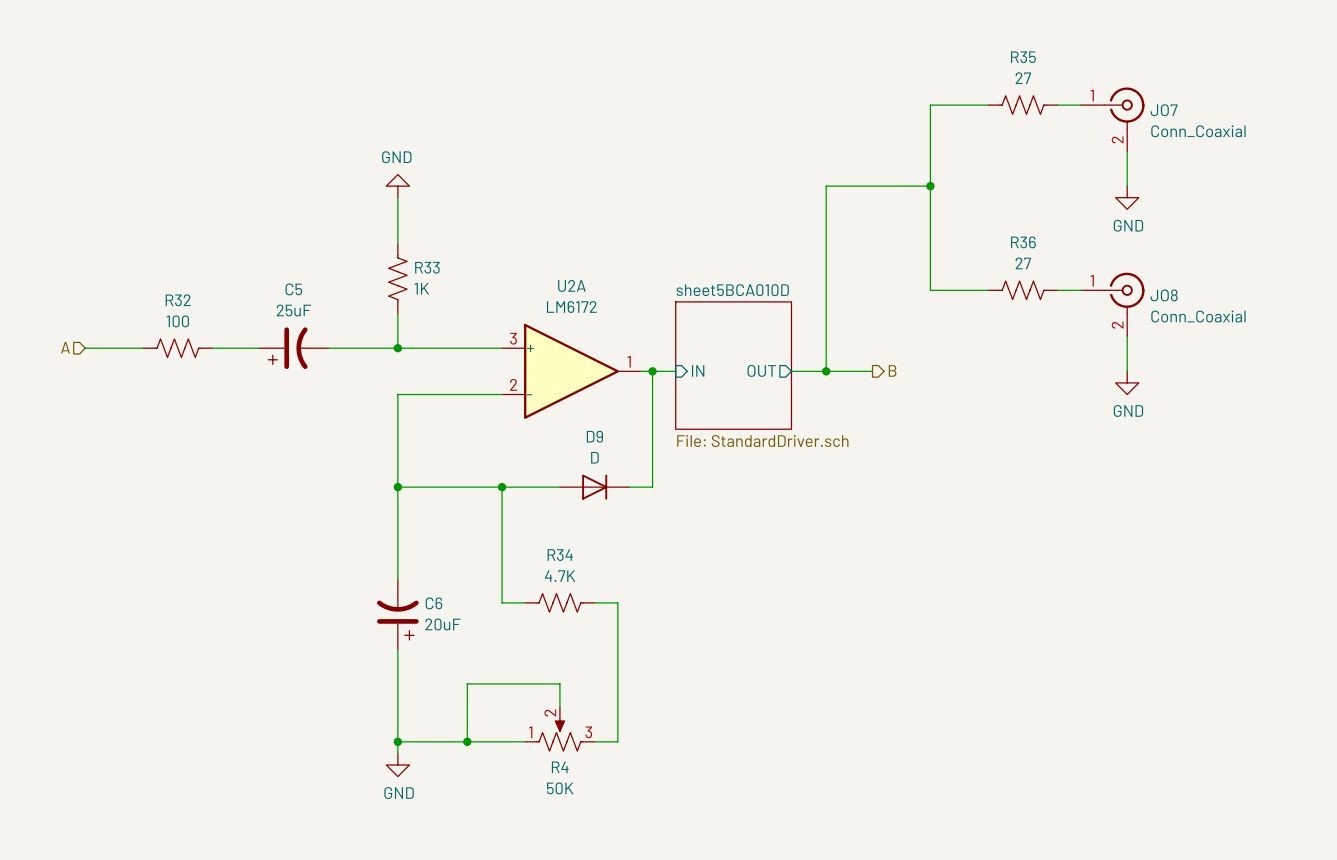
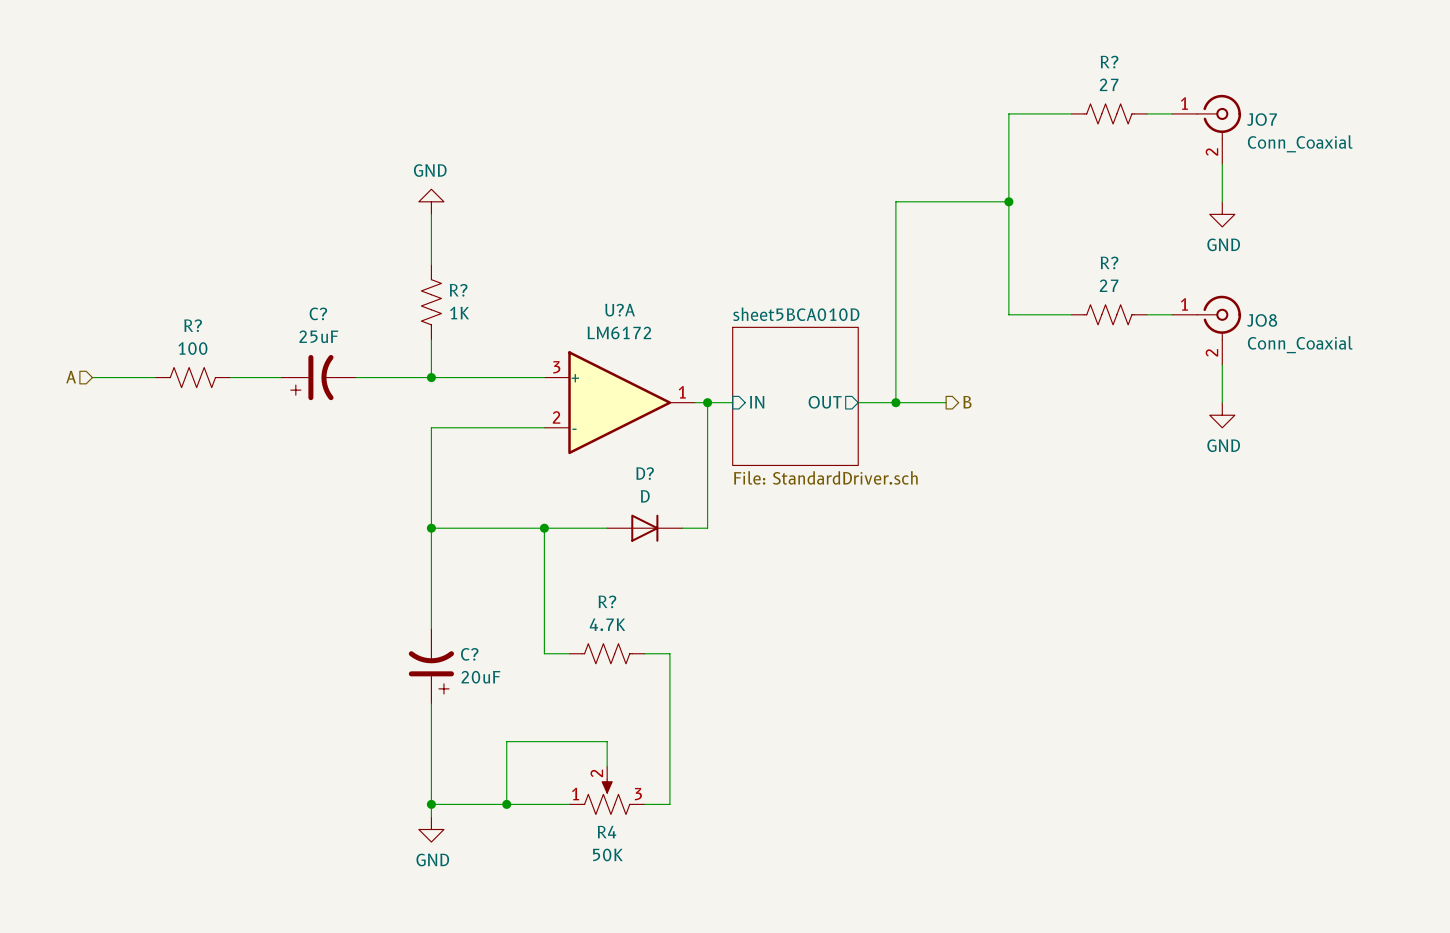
R35 name: R35 (1023, 57) -> R? (1109, 62)
R36 name: R36 (1023, 242) -> R? (1109, 262)
R33 name: R33 (427, 267) -> R? (458, 290)
U2A name: U2A (571, 285) -> U?A (620, 310)
C5 name: C5 (293, 289) -> C? (318, 313)
R32 name: R32 (178, 300) -> R? (193, 325)
D9 name: D9 (594, 436) -> D? (645, 473)
R34 name: R34 (560, 555) -> R? (607, 601)
C6 name: C6 (433, 603) -> C? (469, 654)

